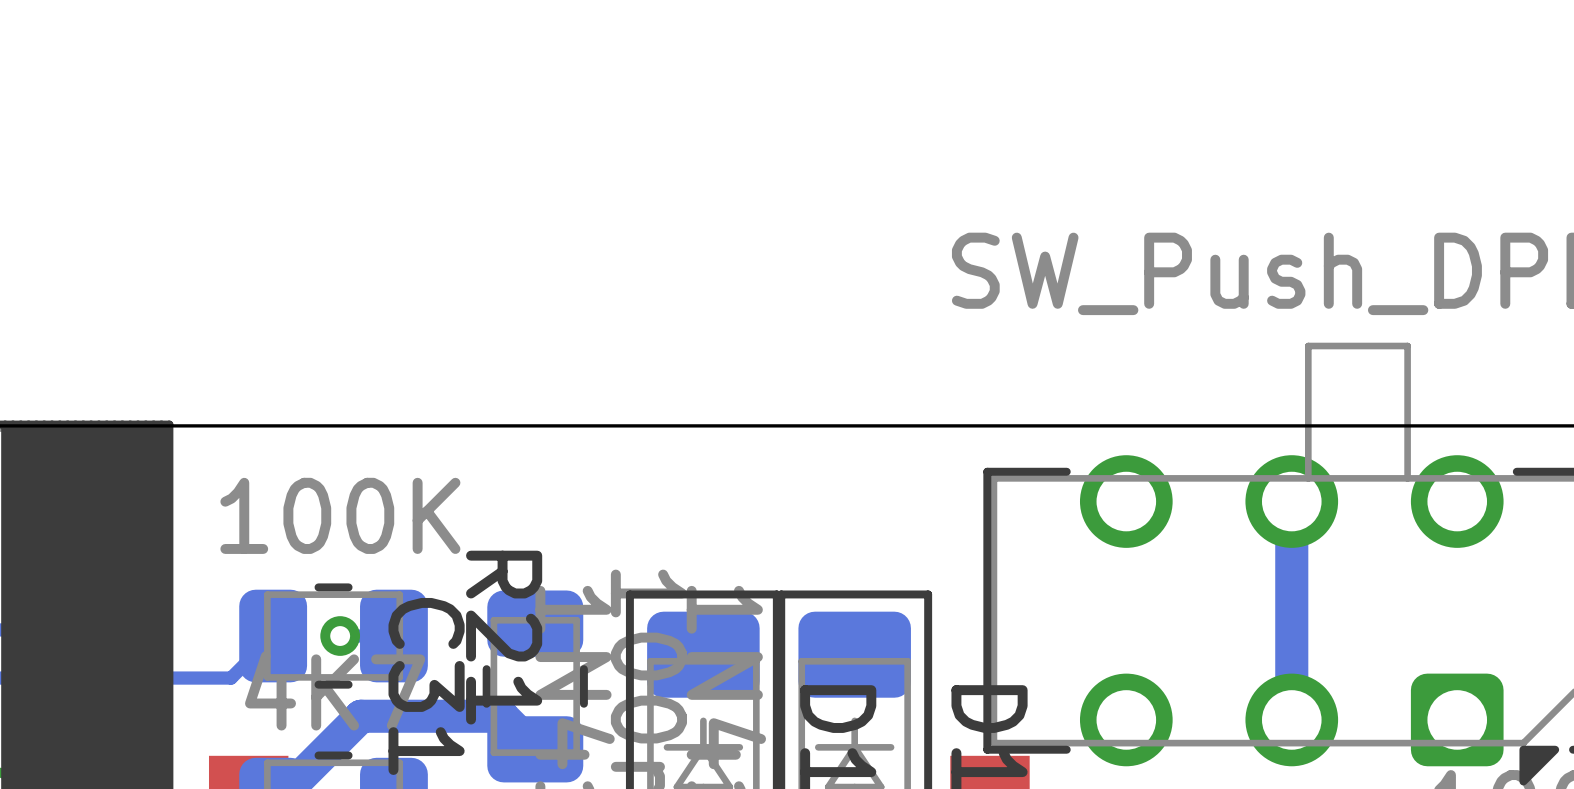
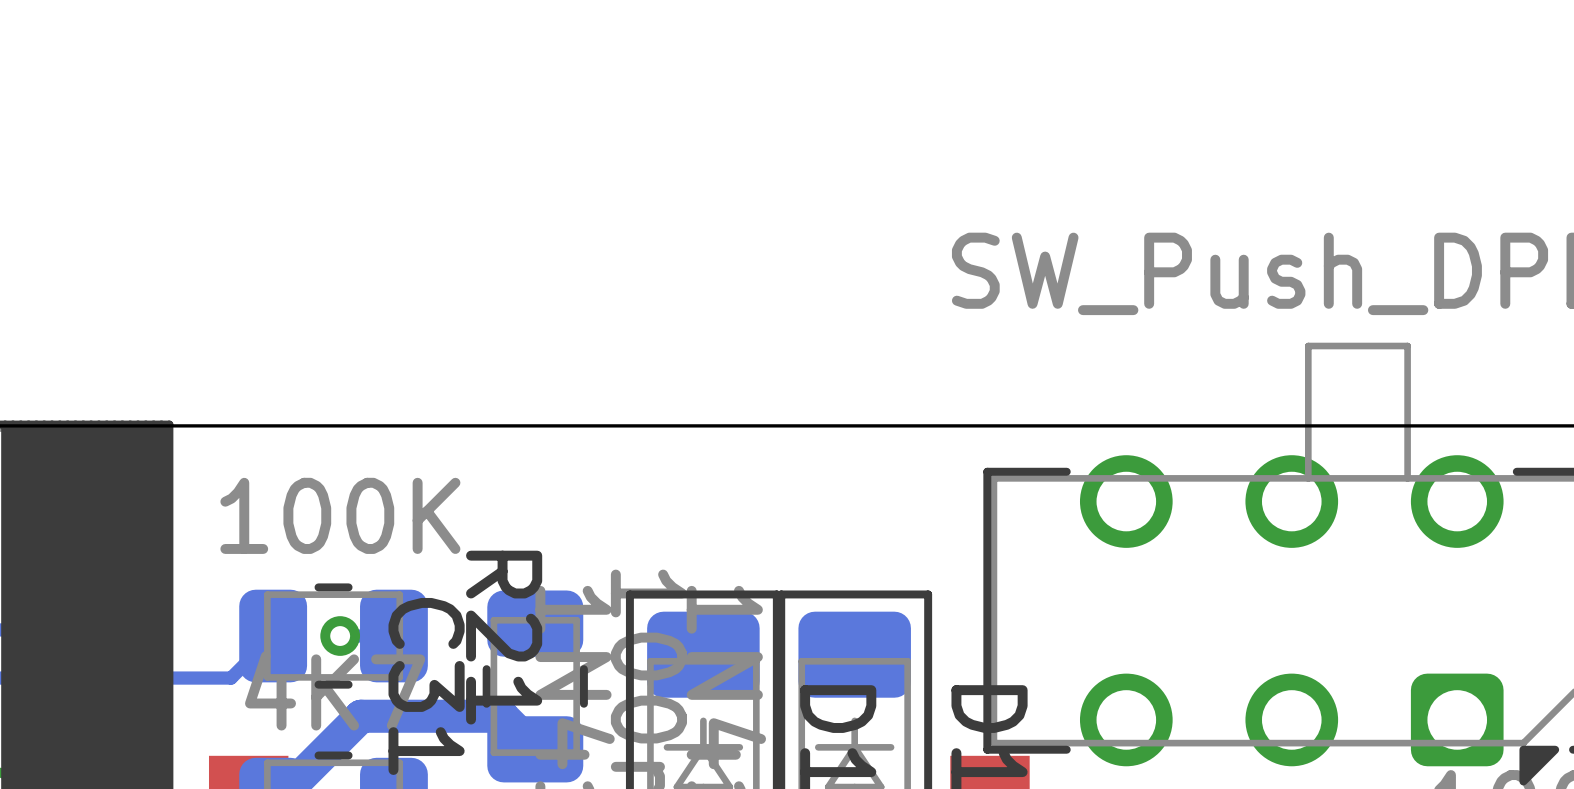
bottom track: (1291, 501) (1291, 719) -> none

